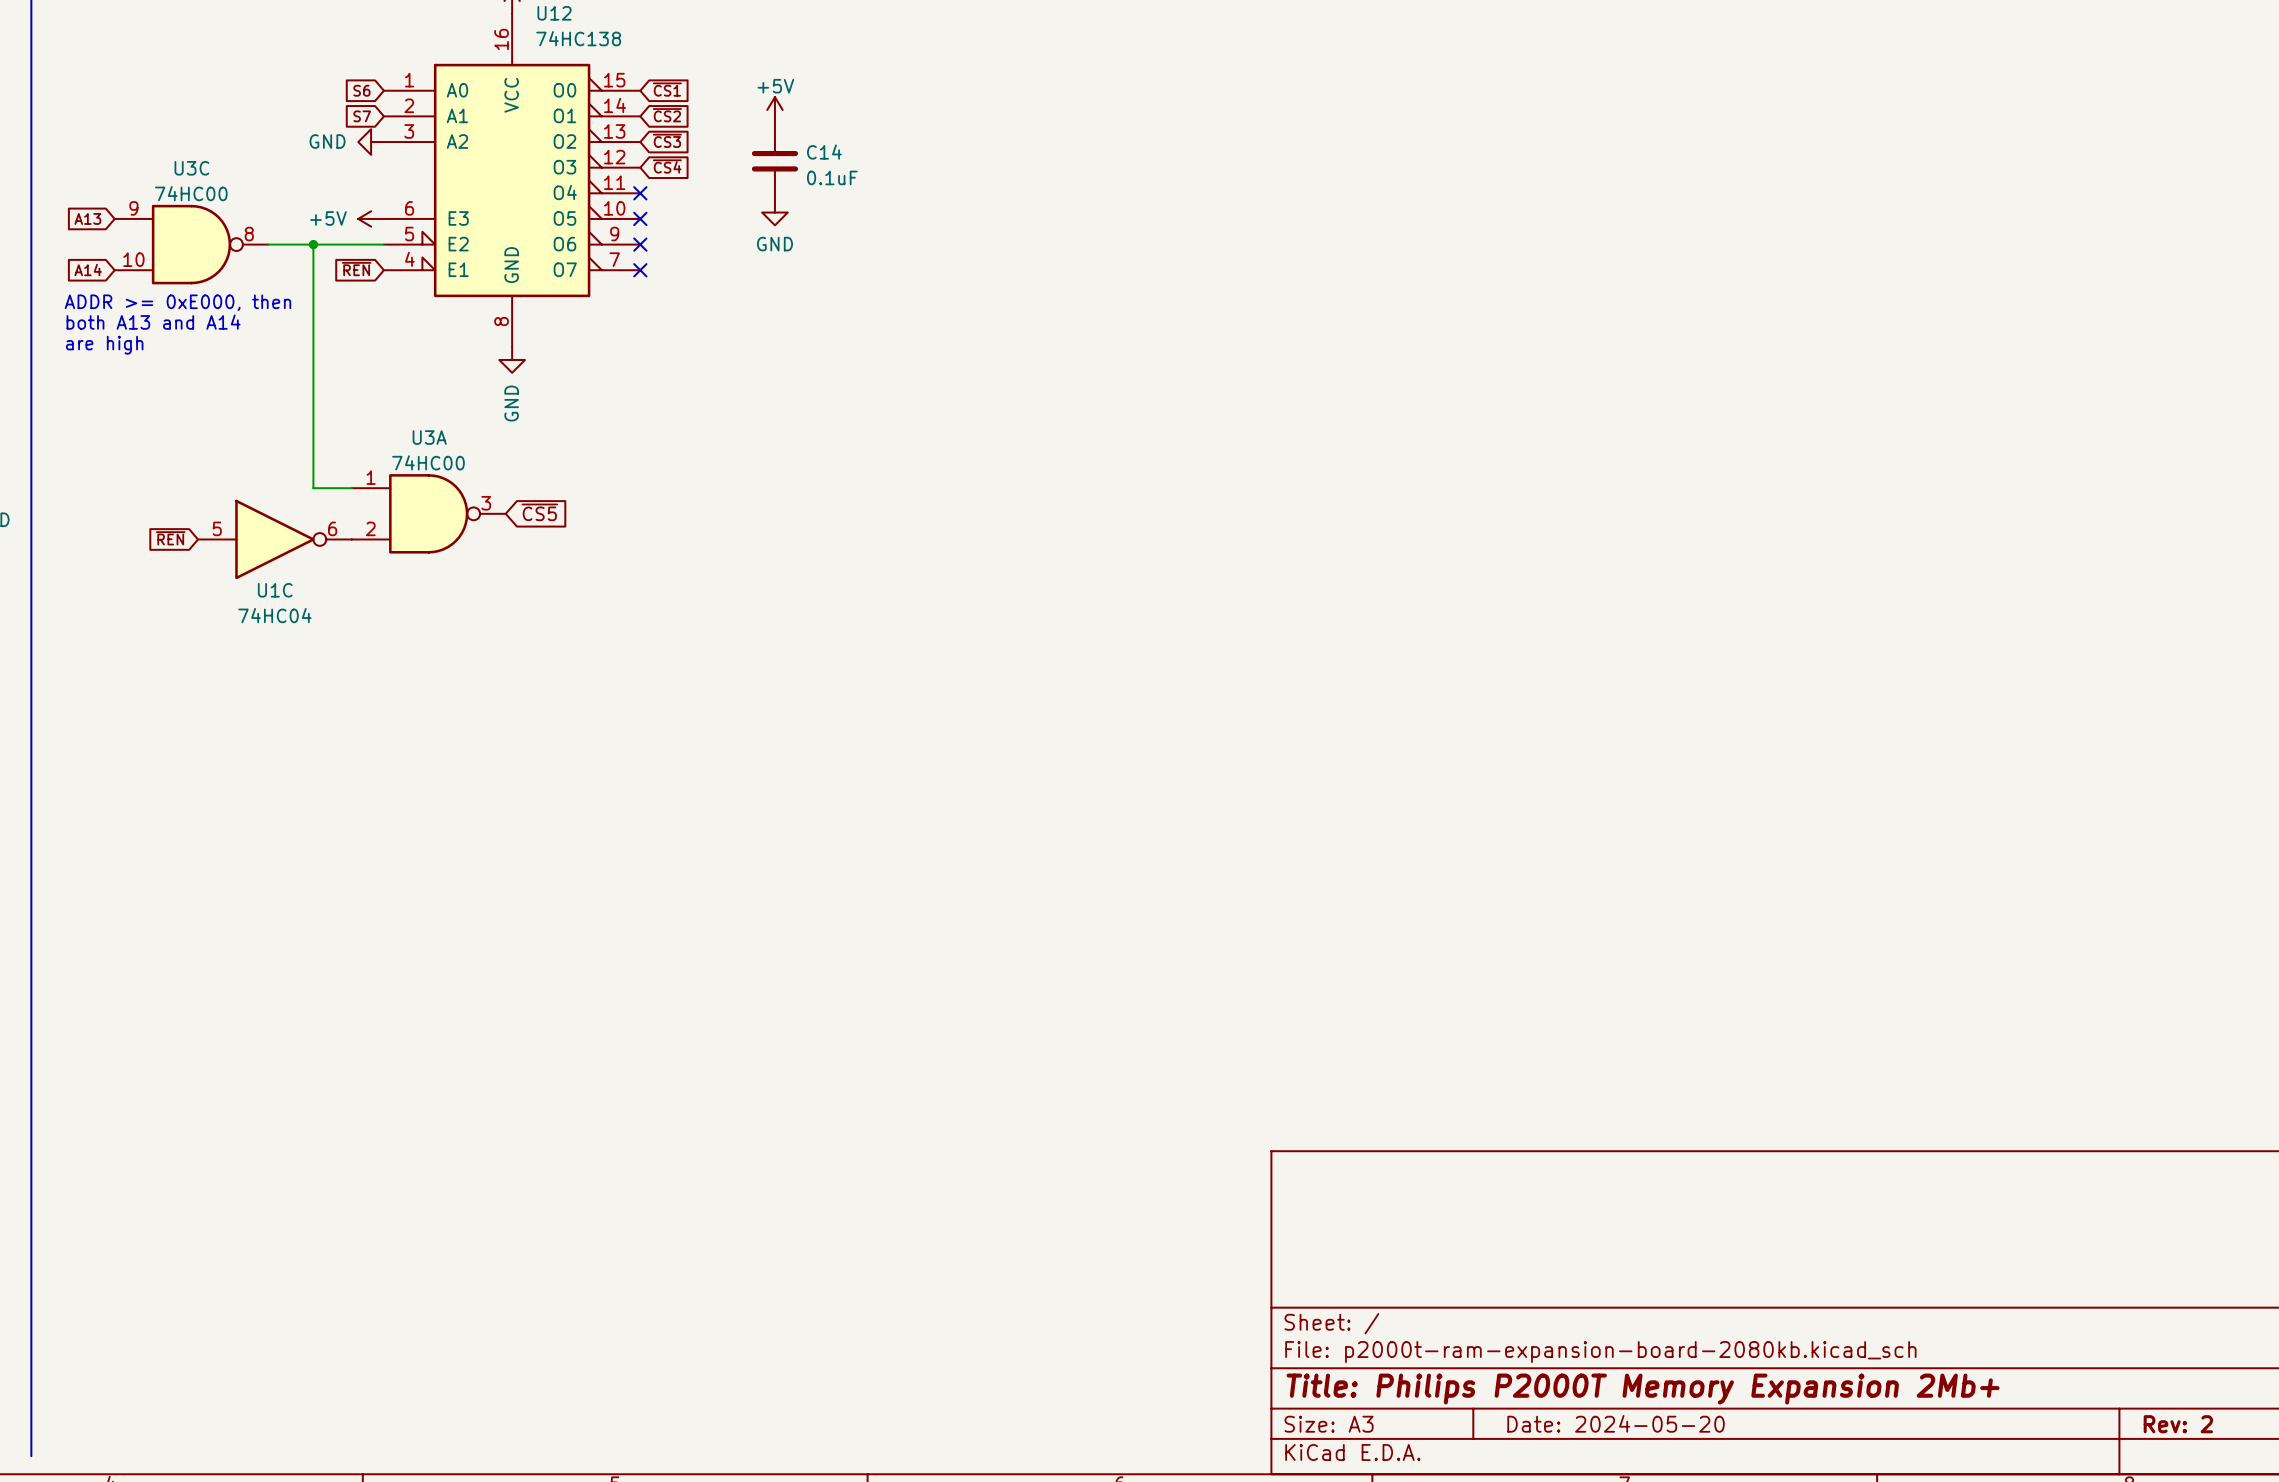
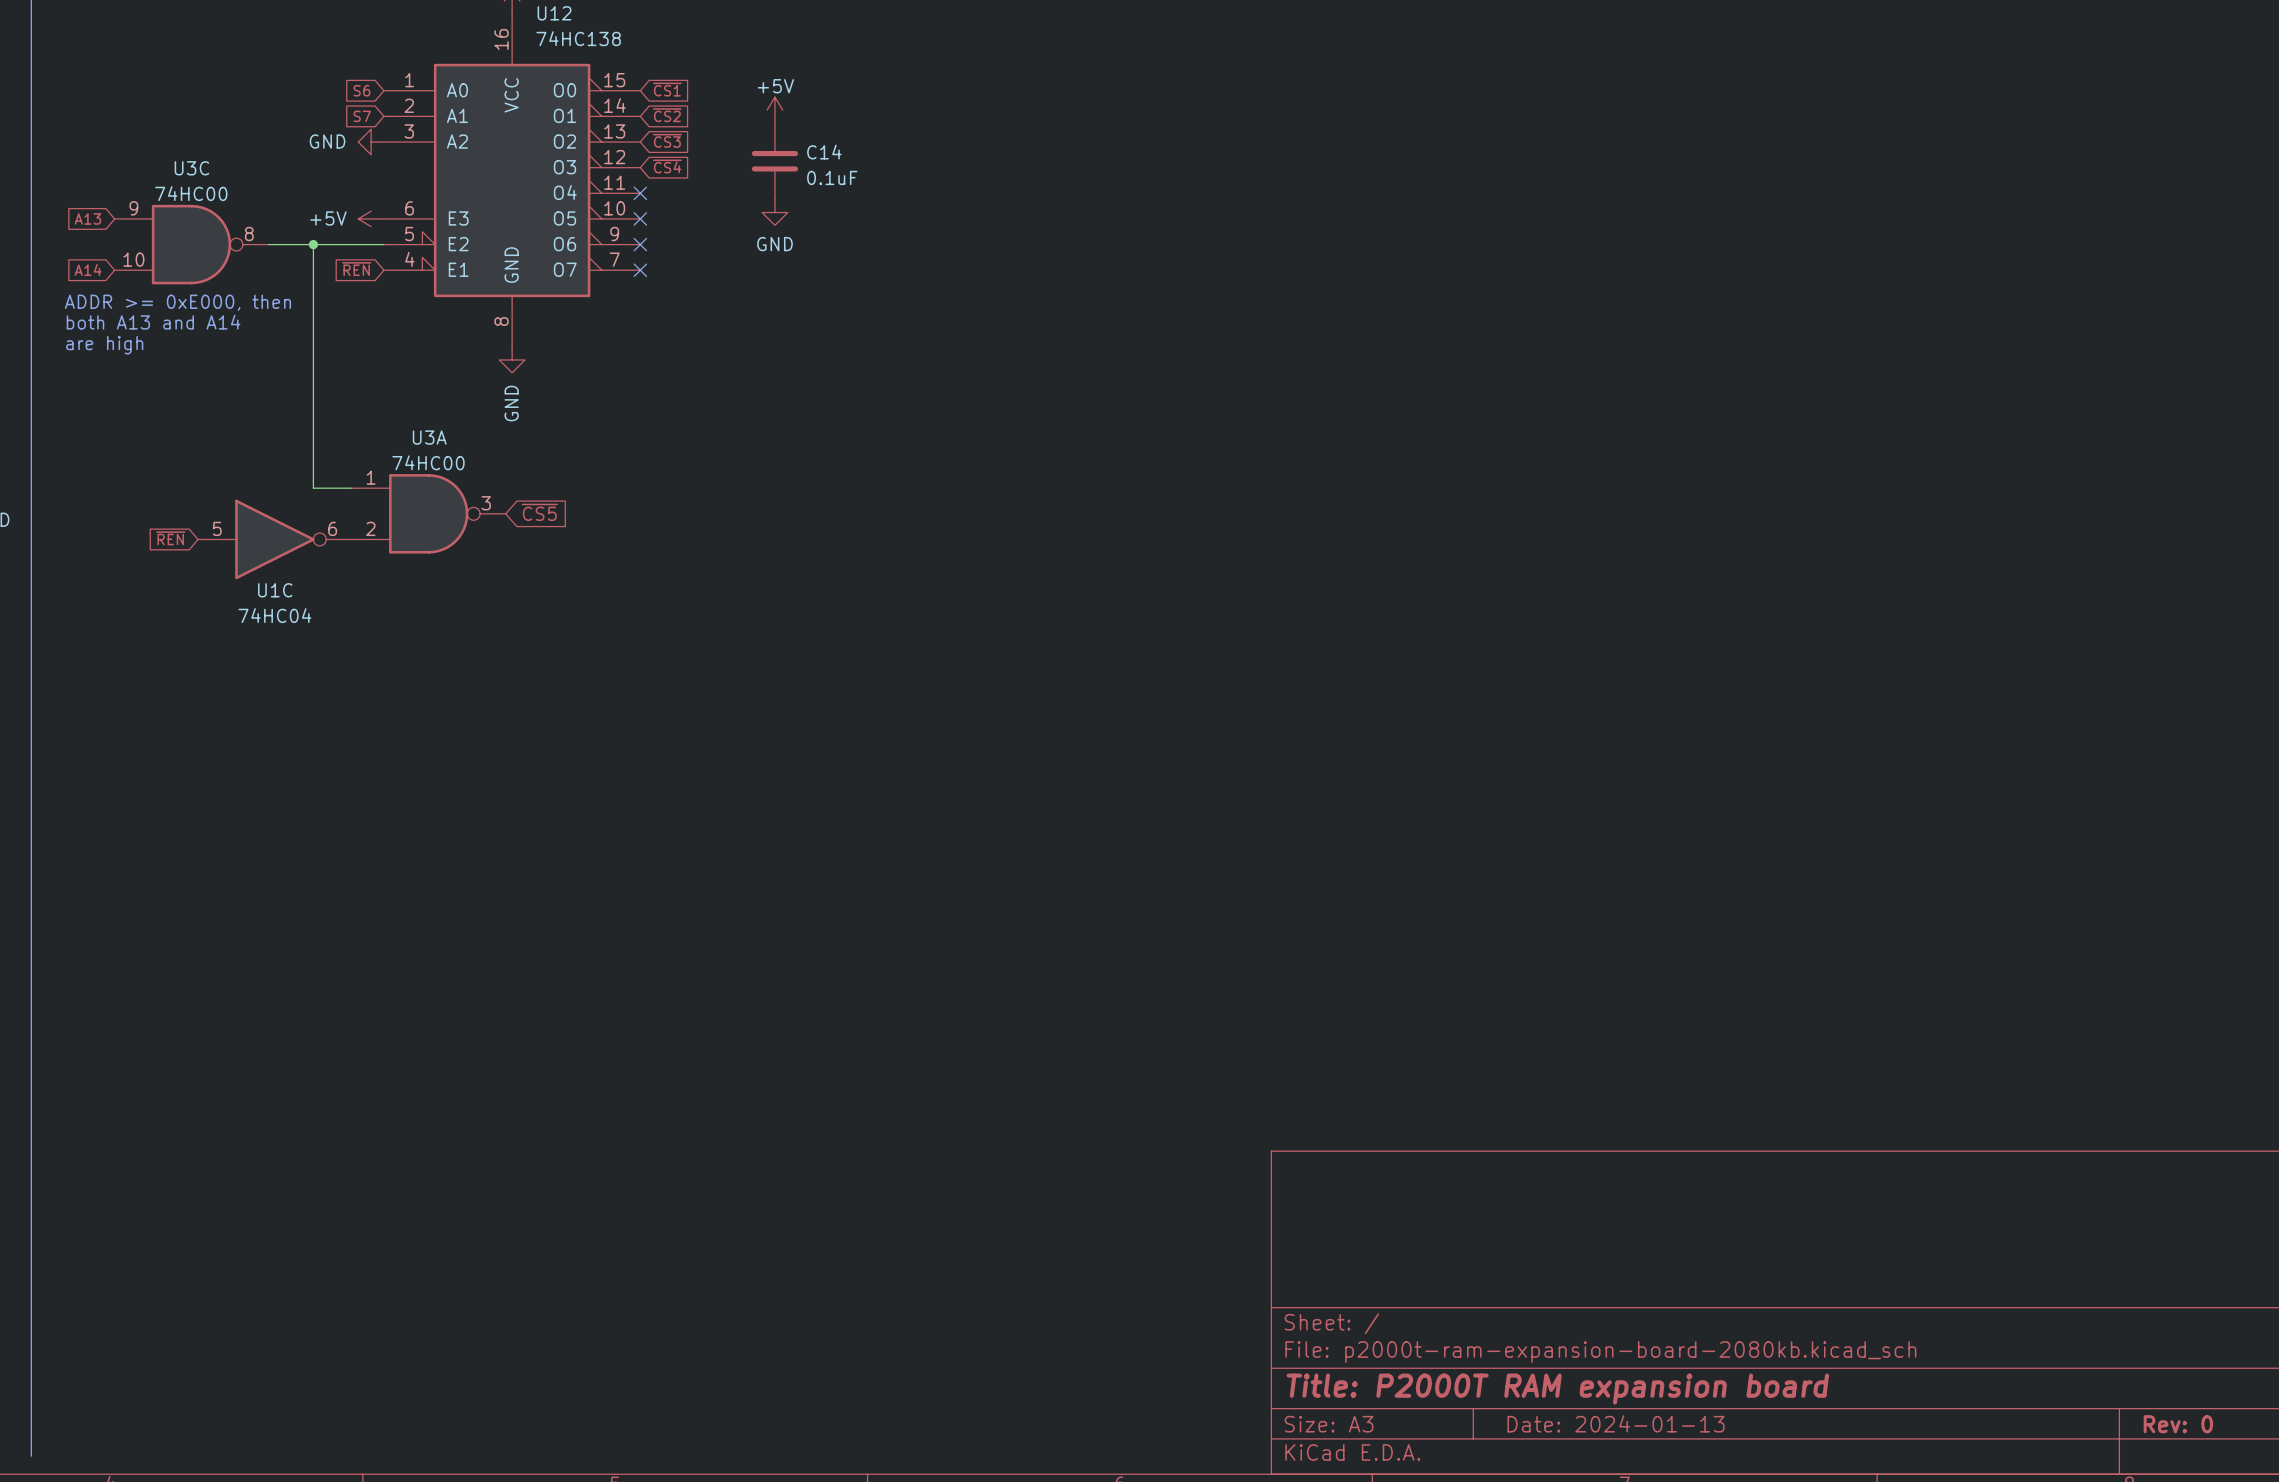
title block: Title: Philips P2000T Memory Expansion 2Mb+ (1643, 1389) -> Title: P2000T RAM expansion board (1557, 1389)
title block: Date: 2024-05-20 (1616, 1423) -> Date: 2024-01-13 (1616, 1423)
title block: Rev: 2 (2178, 1424) -> Rev: 0 (2178, 1424)

